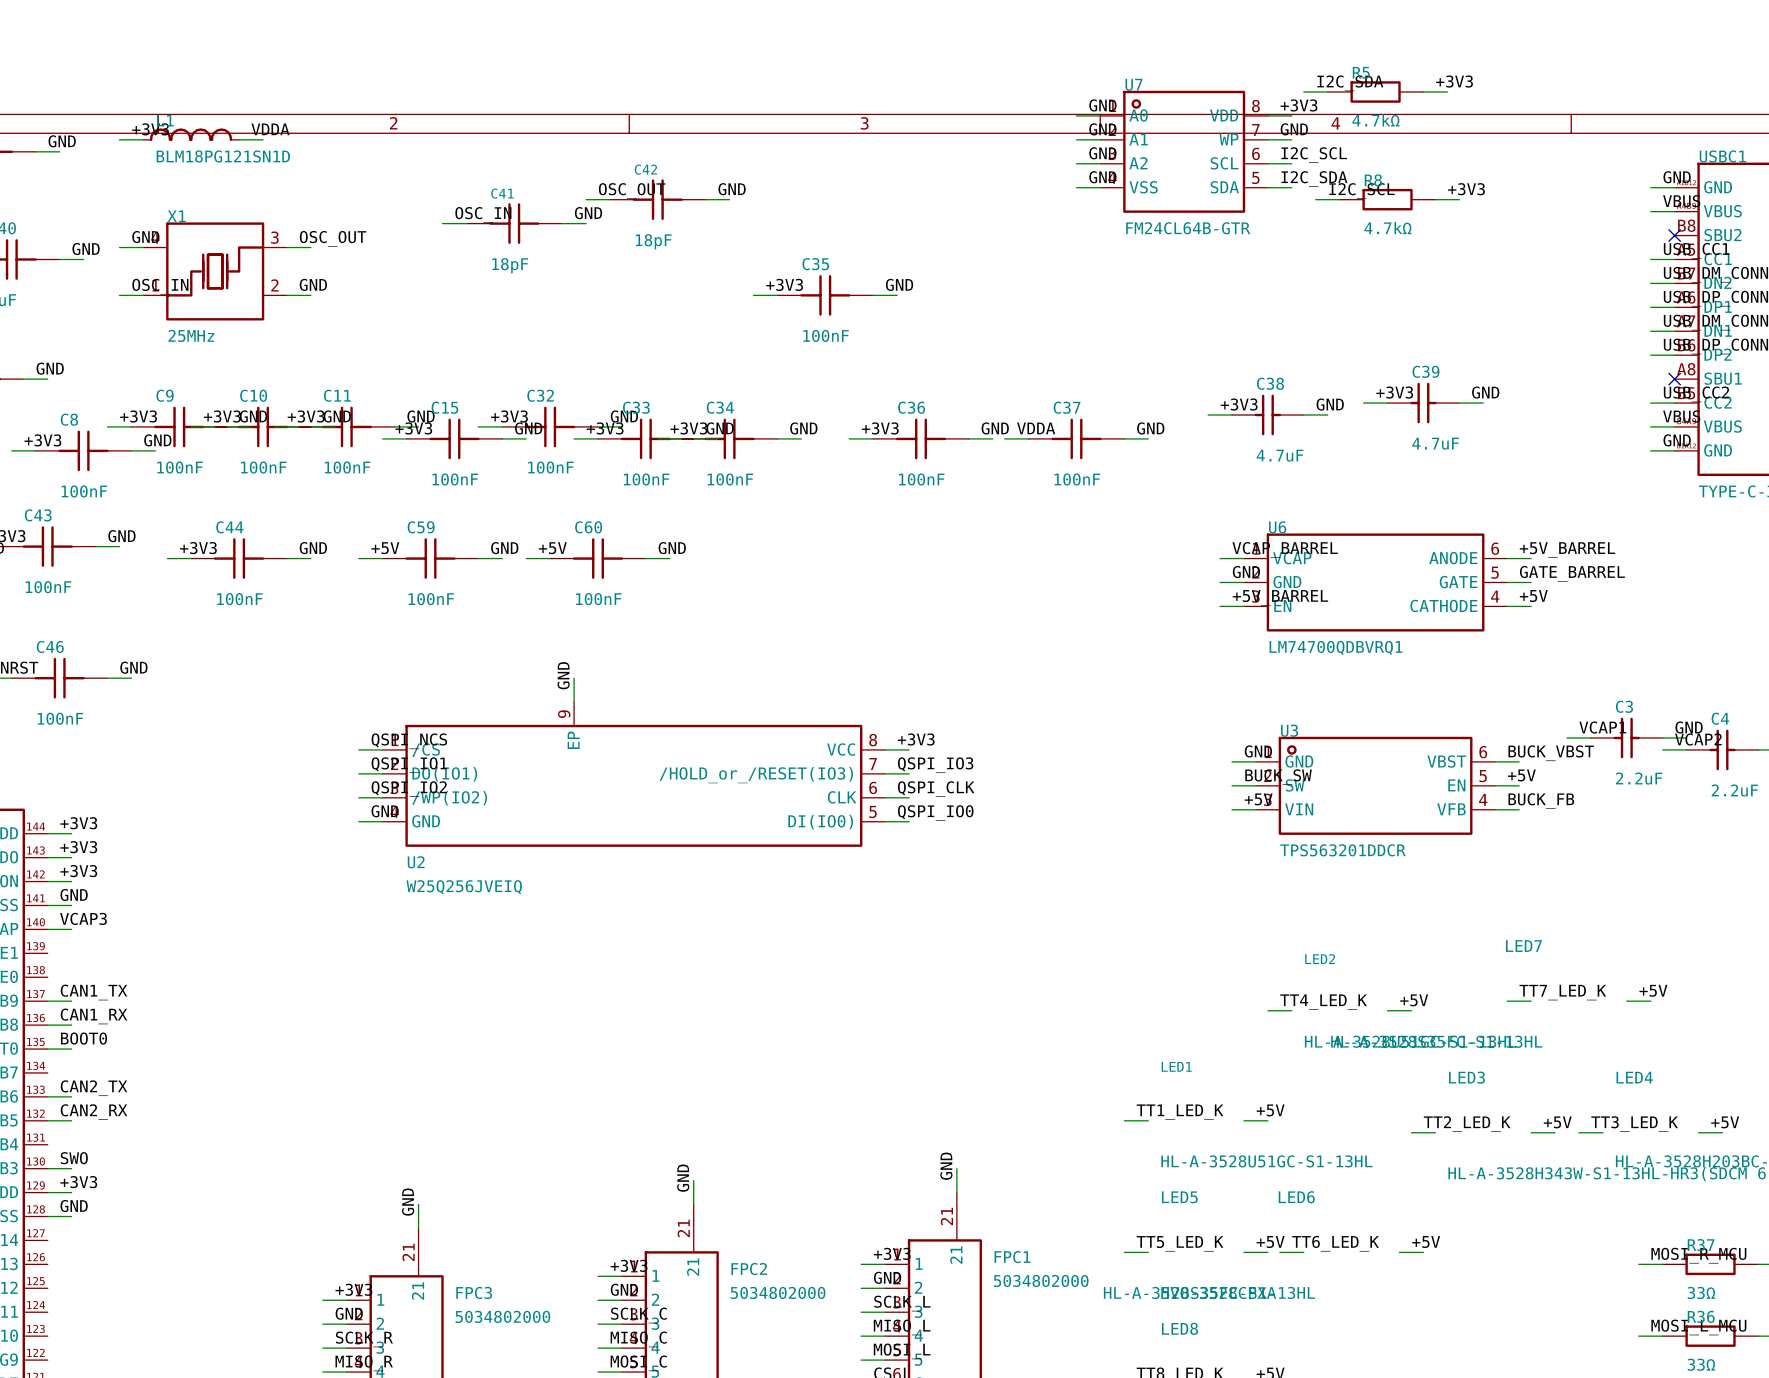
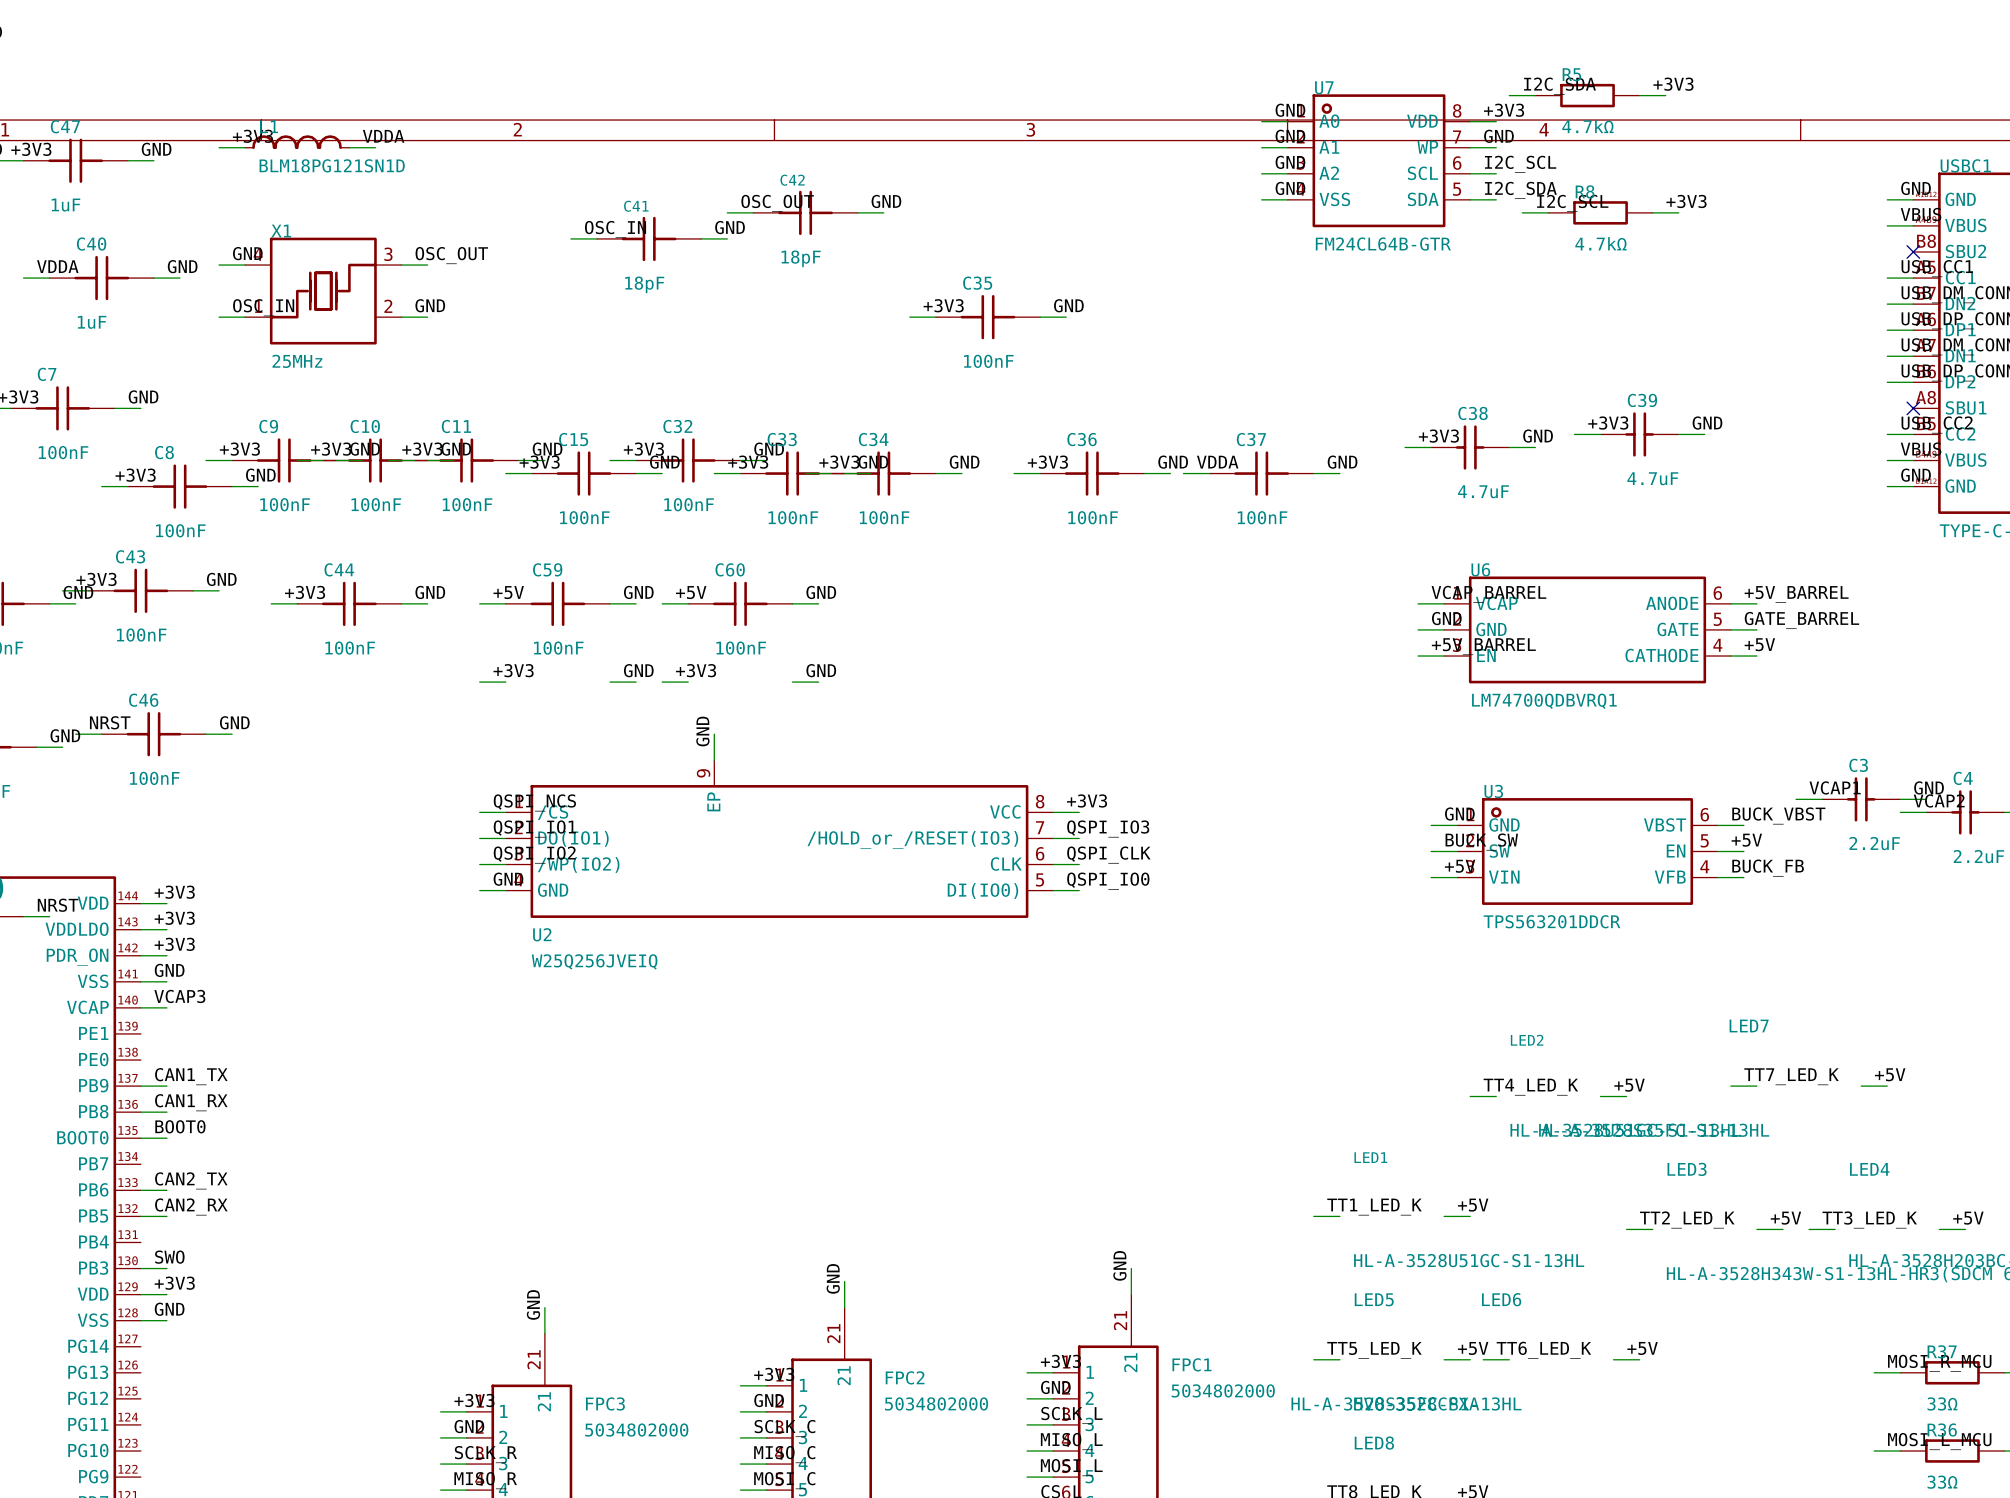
label: none -> +3V3 (513, 670)
label: none -> GND (638, 670)
label: none -> +3V3 (696, 670)
label: none -> GND (821, 670)
wire: none -> (479, 682) (505, 682)
wire: none -> (610, 682) (636, 682)
wire: none -> (662, 682) (688, 682)
wire: none -> (792, 682) (818, 682)

